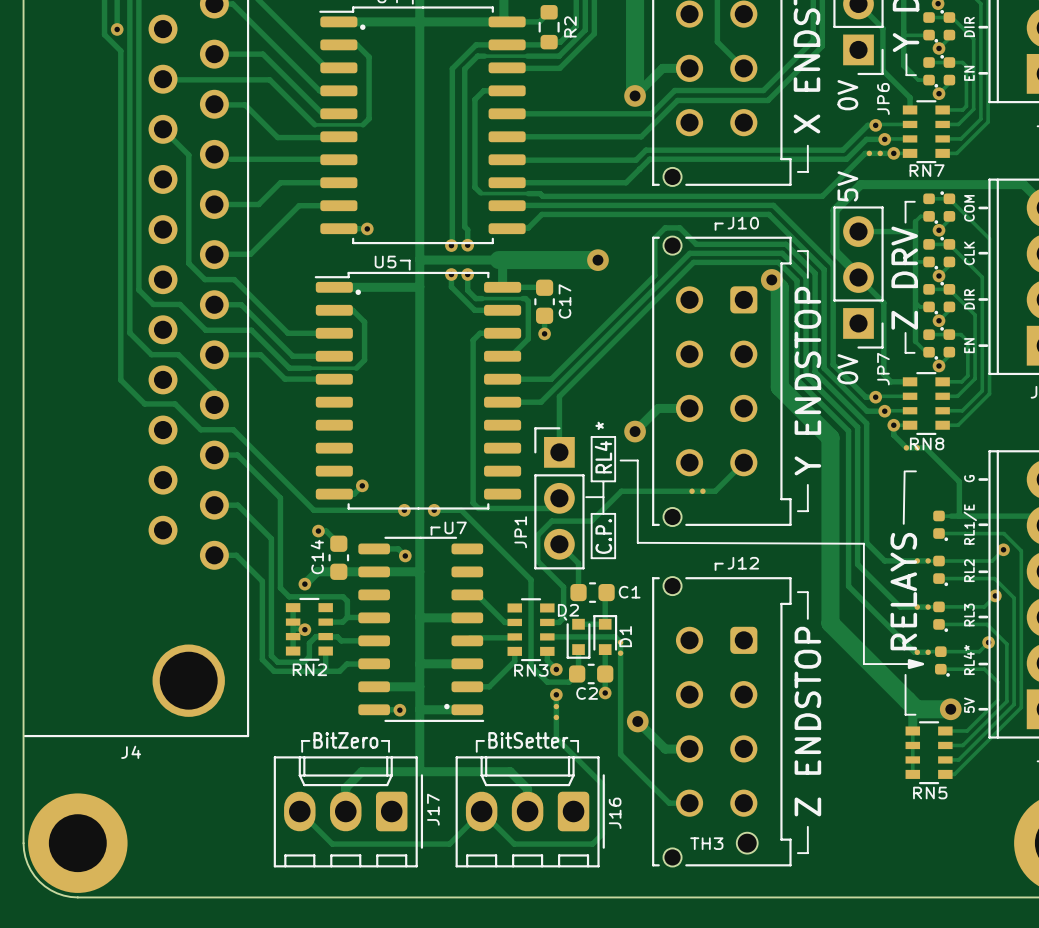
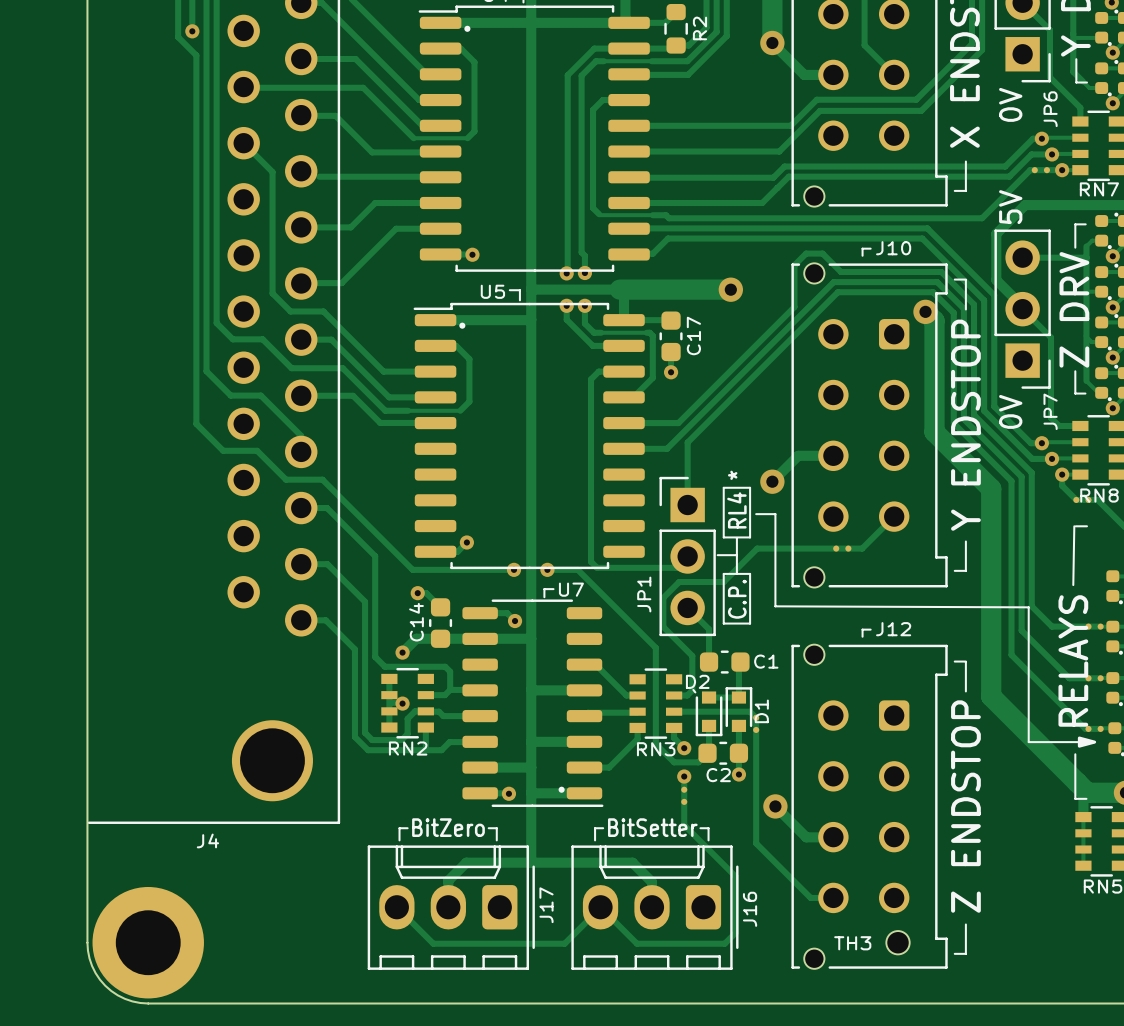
track: (635, 39) (635, 95) (663, 68) -> (772, 42) (804, 74)
via: none -> (772, 42)
via: (635, 95) -> none

